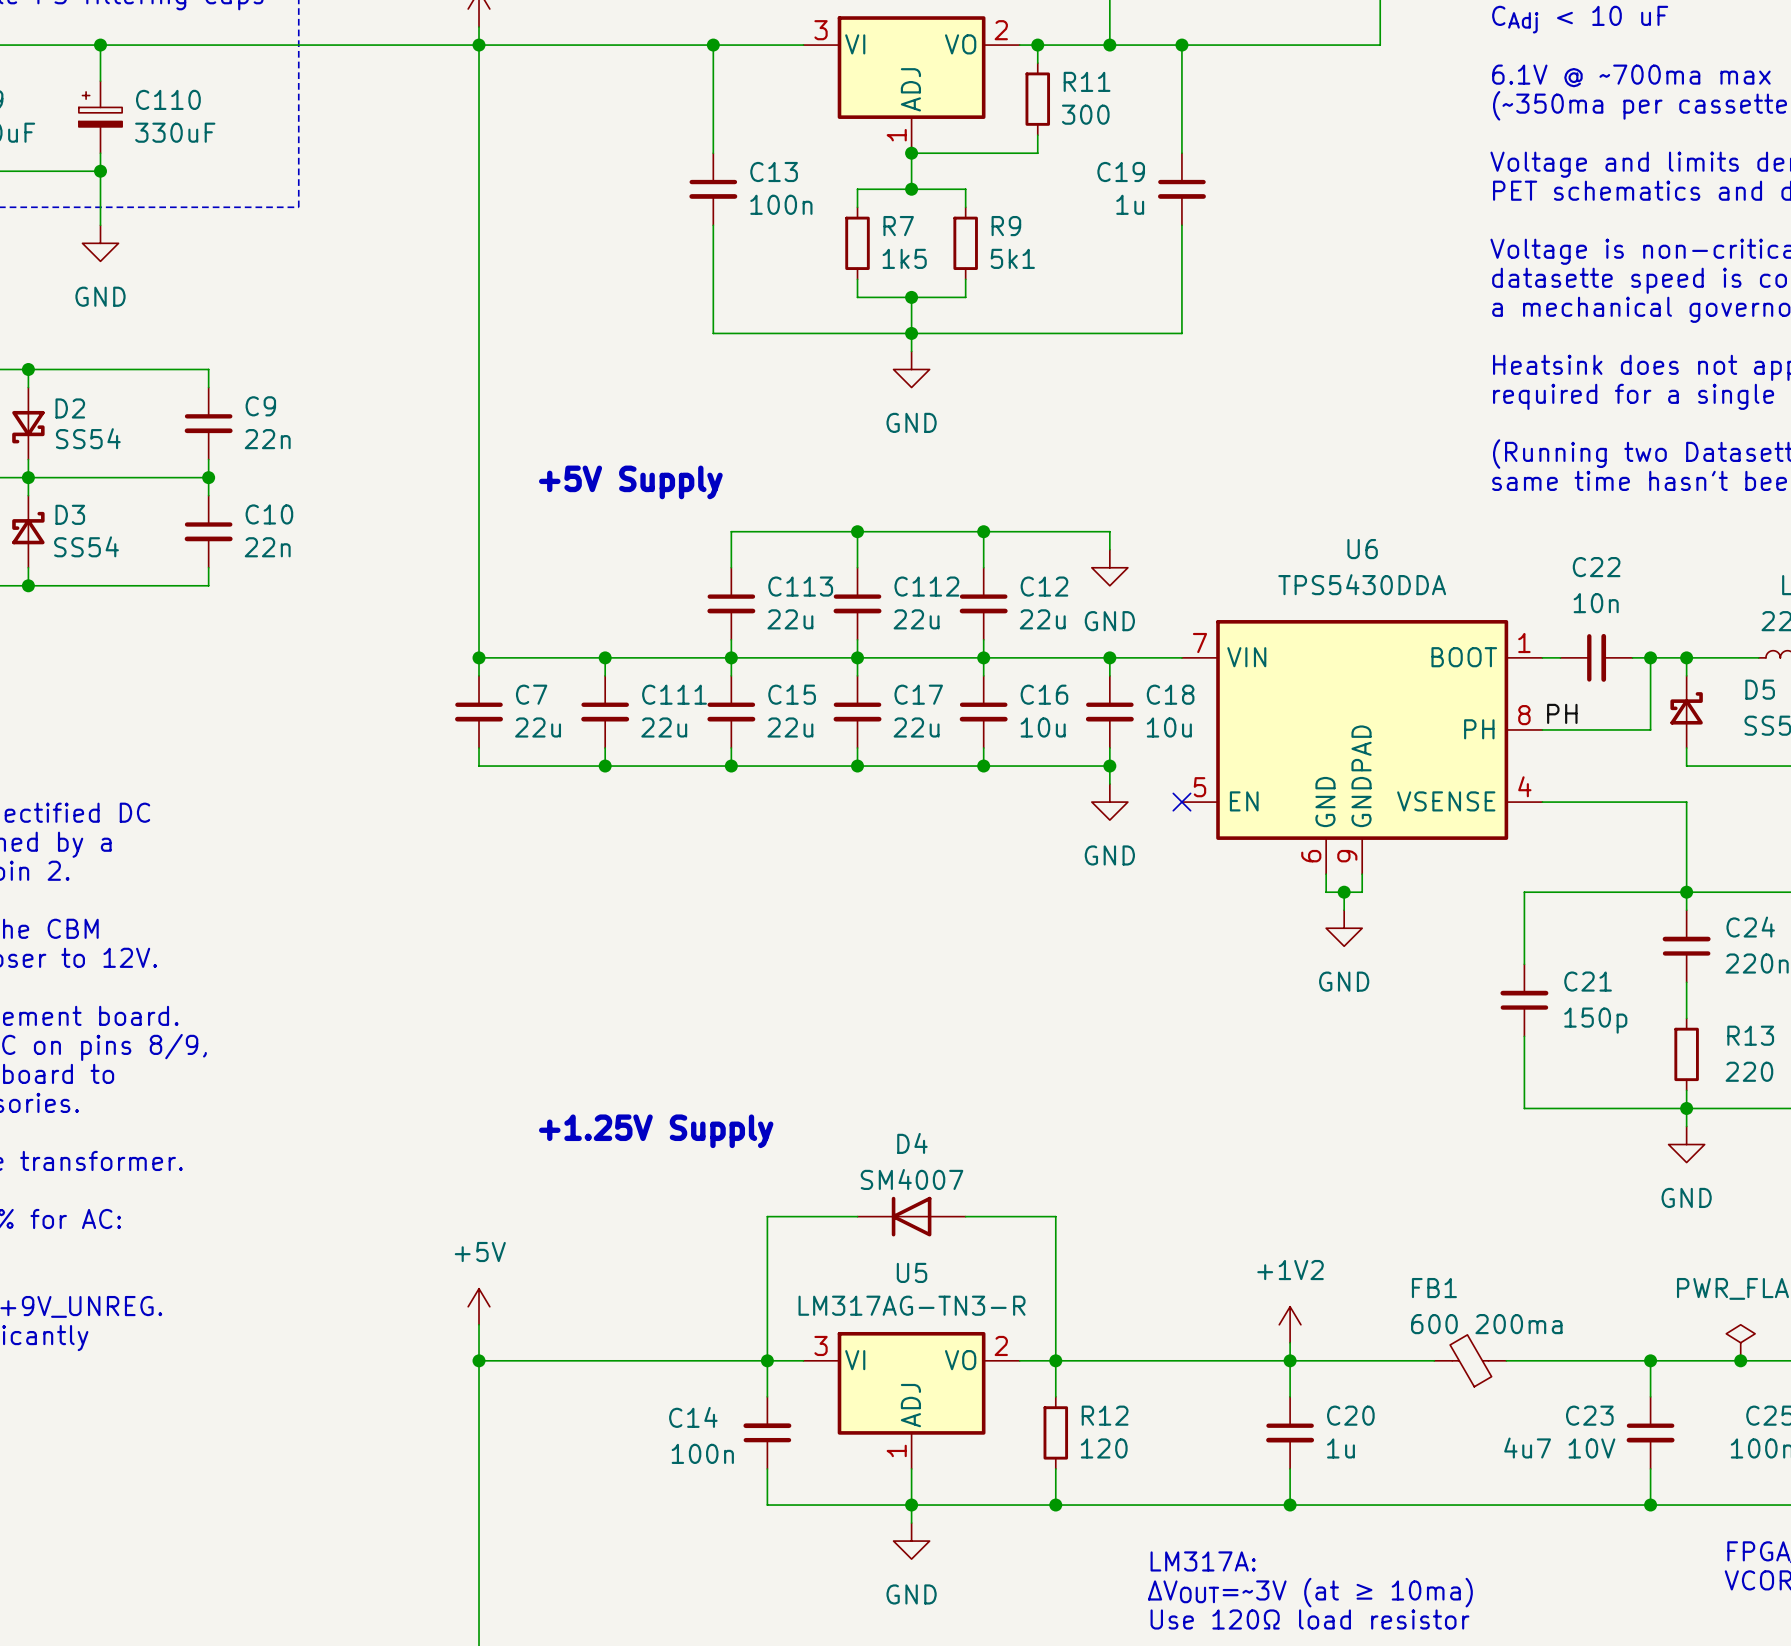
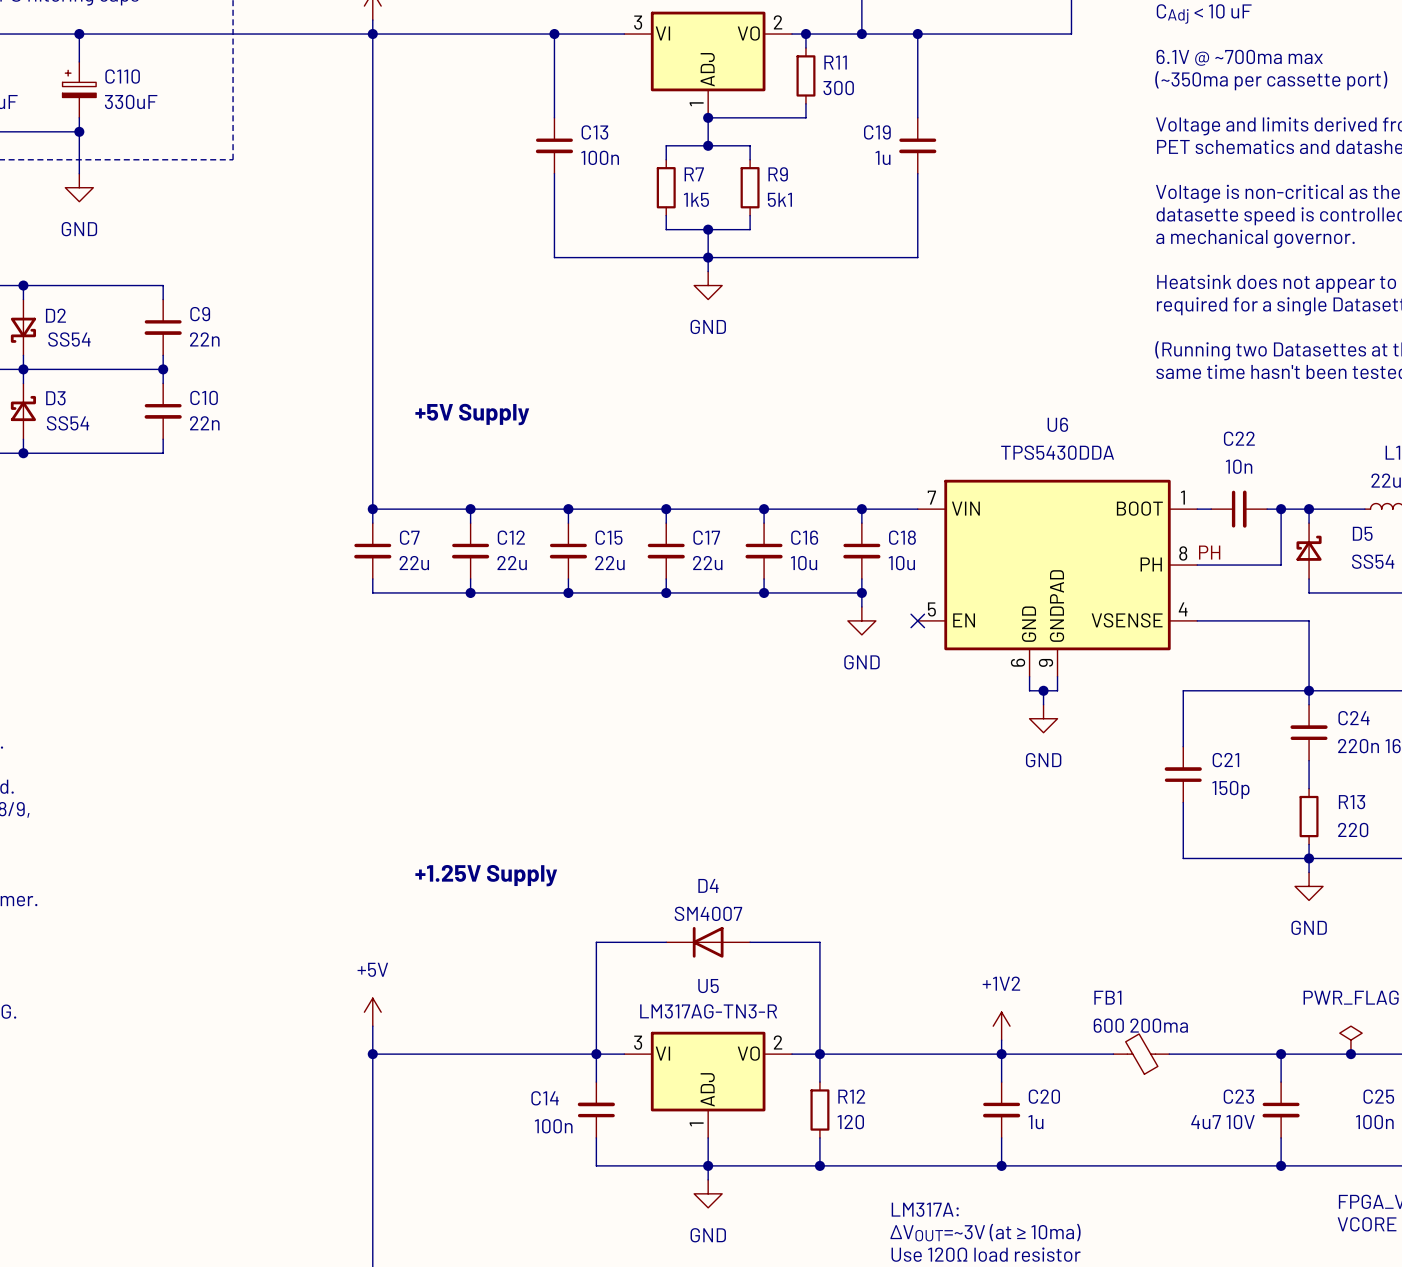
text position: +5V Supply (630, 482) -> +5V Supply (472, 414)
wire: (857, 531) (857, 567) -> none
junction: (857, 531) -> none
wire: (983, 531) (983, 567) -> none
junction: (983, 531) -> none
wire: (1109, 549) (1109, 531) (731, 531) (731, 567) -> none
power symbol: GND (1109, 567) -> none
C113: 22u (731, 603) -> none
C112: 22u (857, 603) -> none
C12: 22u (983, 603) -> none
wire: (731, 639) (731, 657) -> none
wire: (857, 639) (857, 657) -> none
wire: (983, 639) (983, 657) -> none
C111 name: C111 (674, 694) -> C12 (511, 537)

